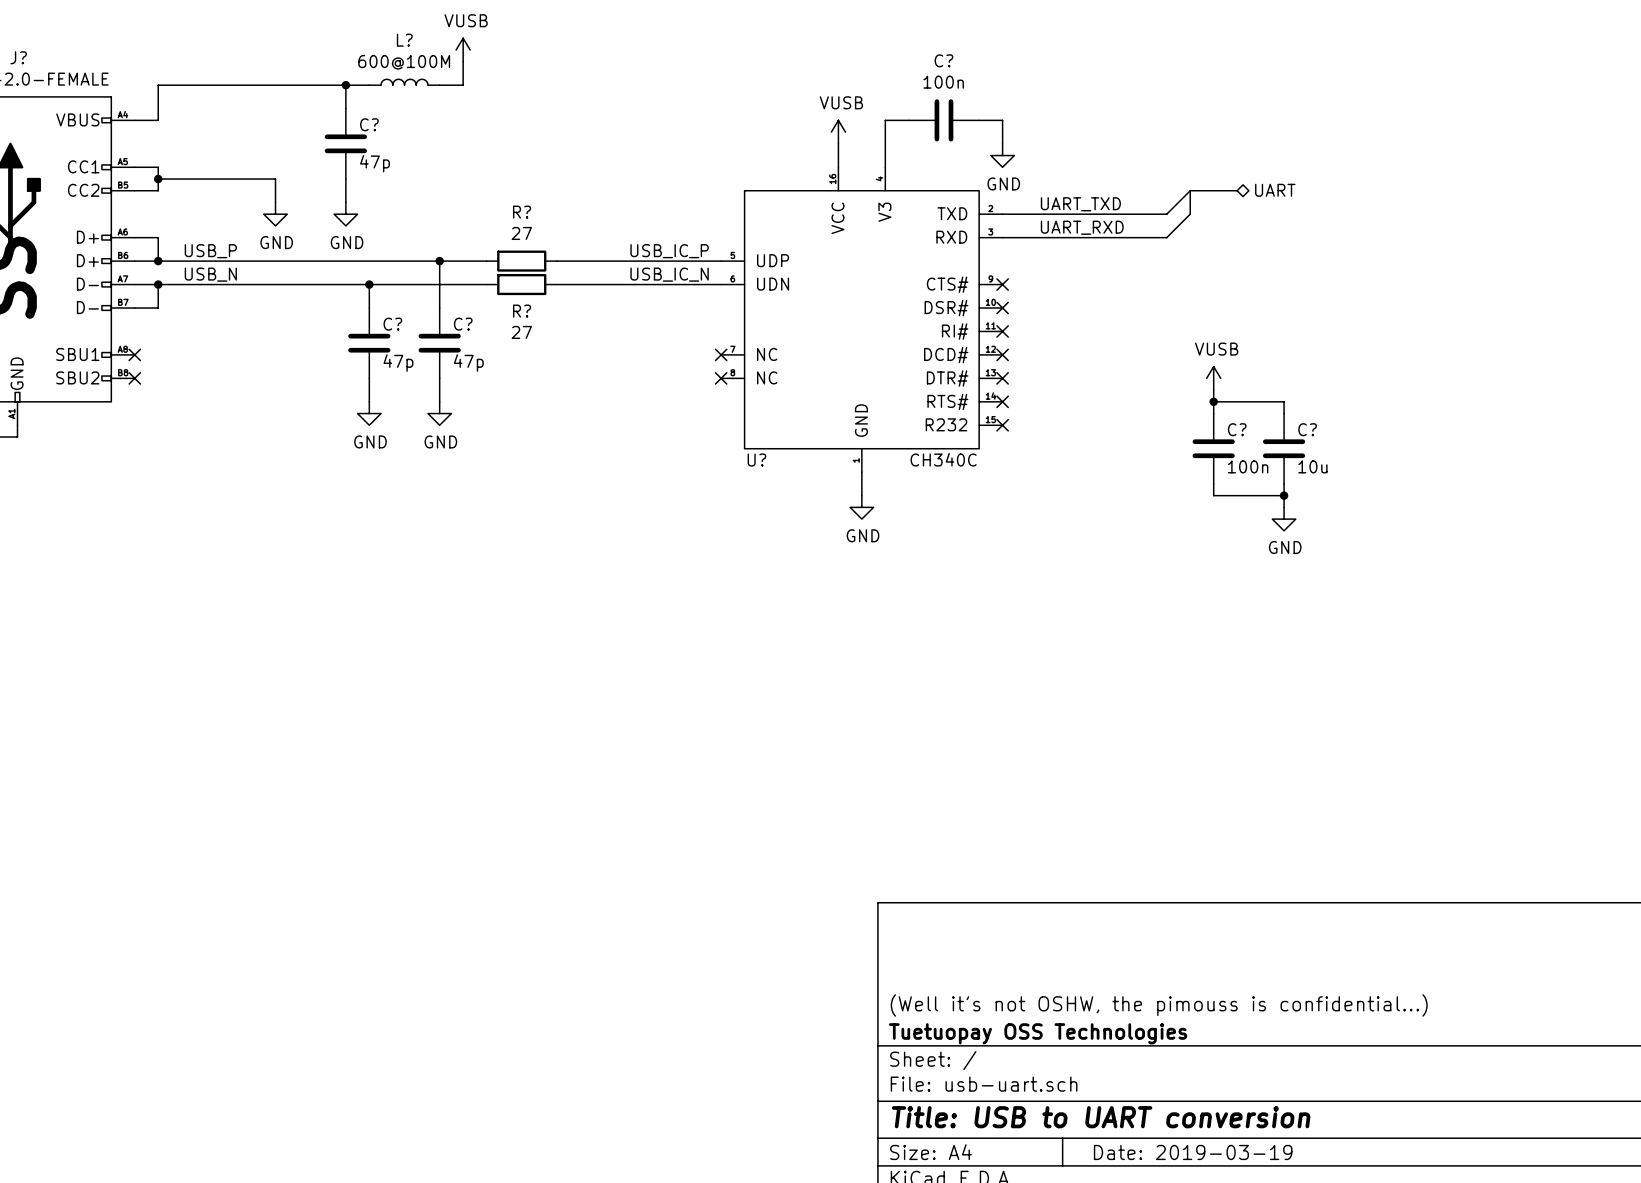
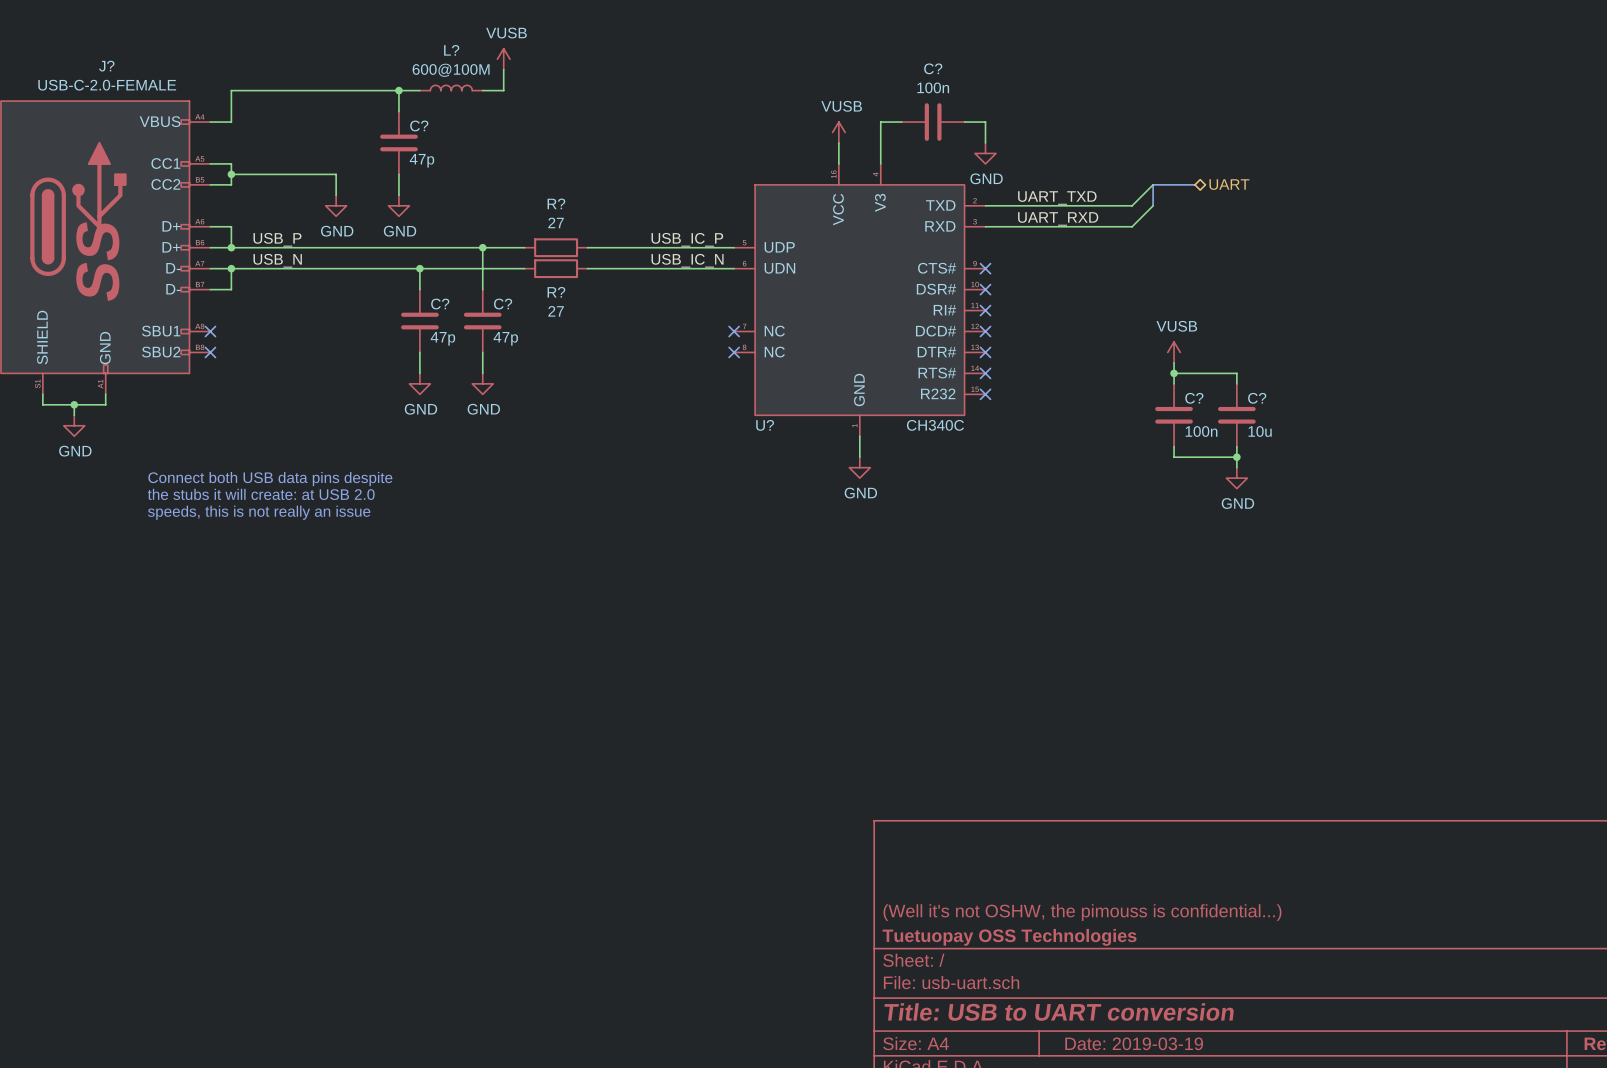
text: none -> Connect both USB data pins despite (270, 479)
text: none -> the stubs it will create: at USB 2.0 (261, 494)
text: none -> speeds, this is not really an issue (259, 512)

